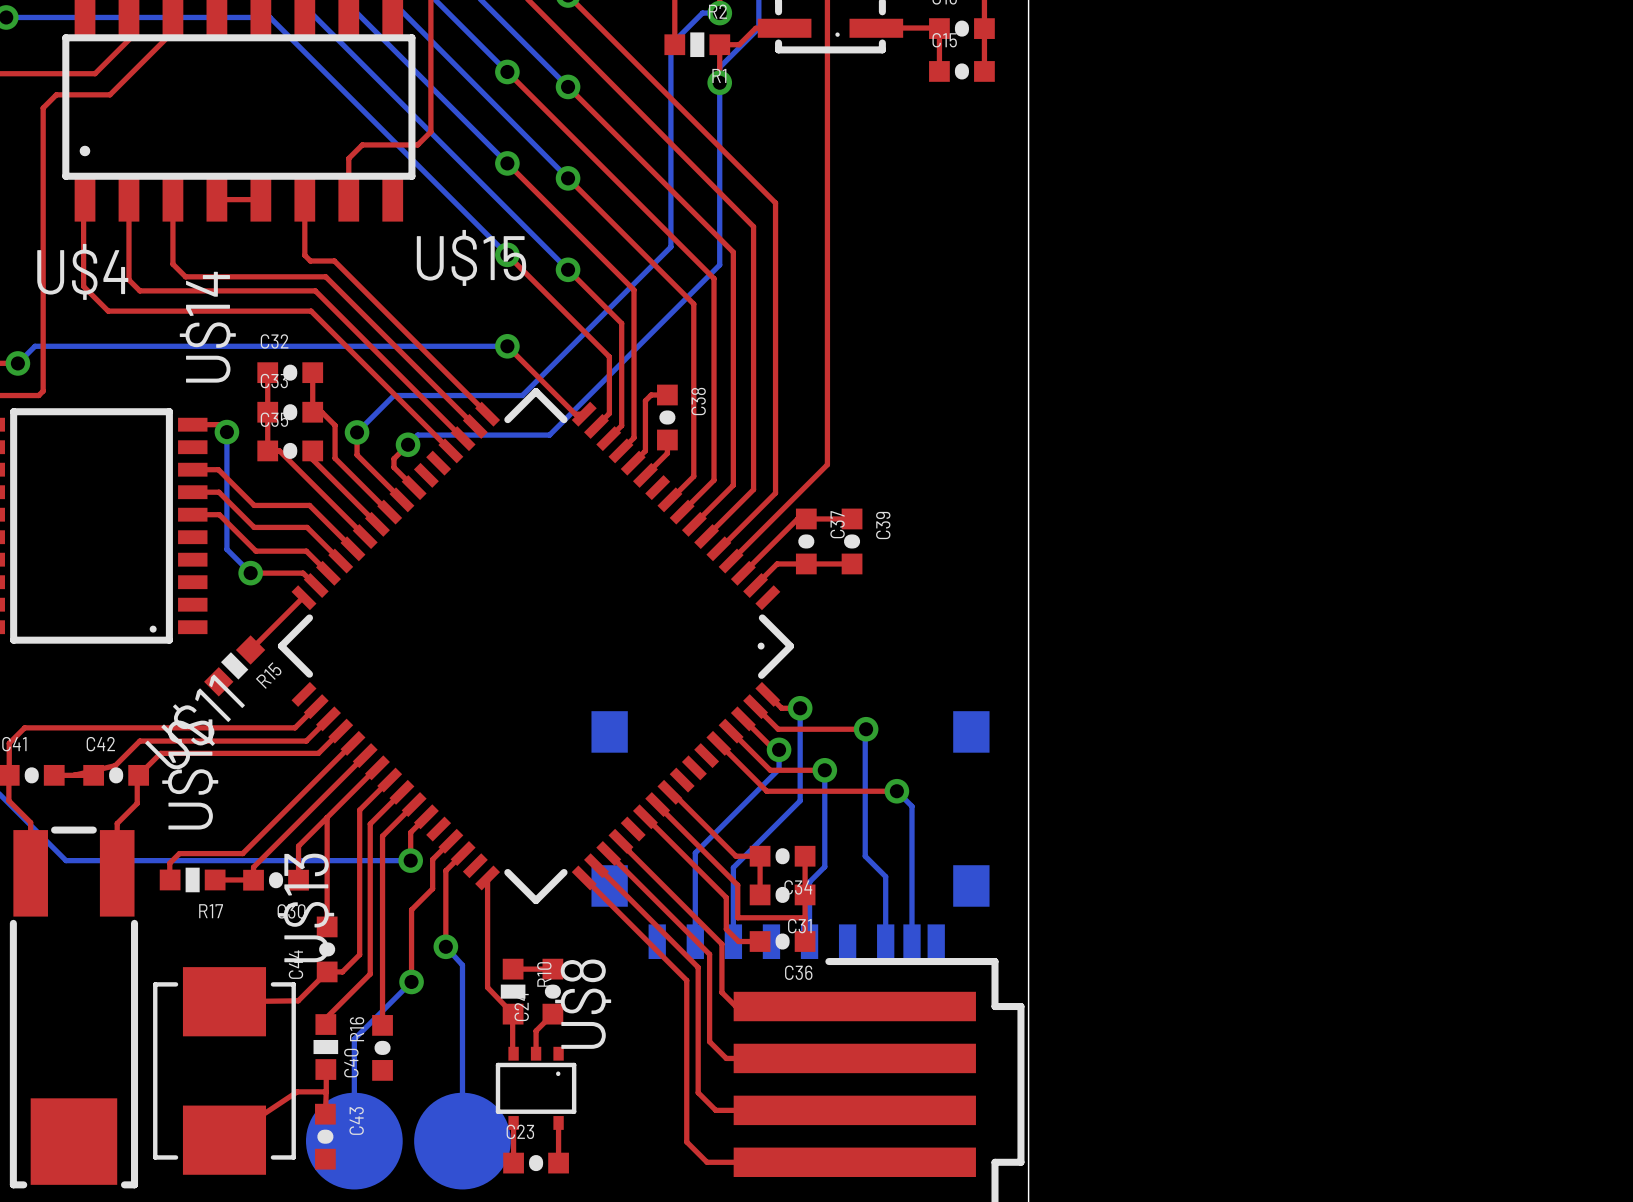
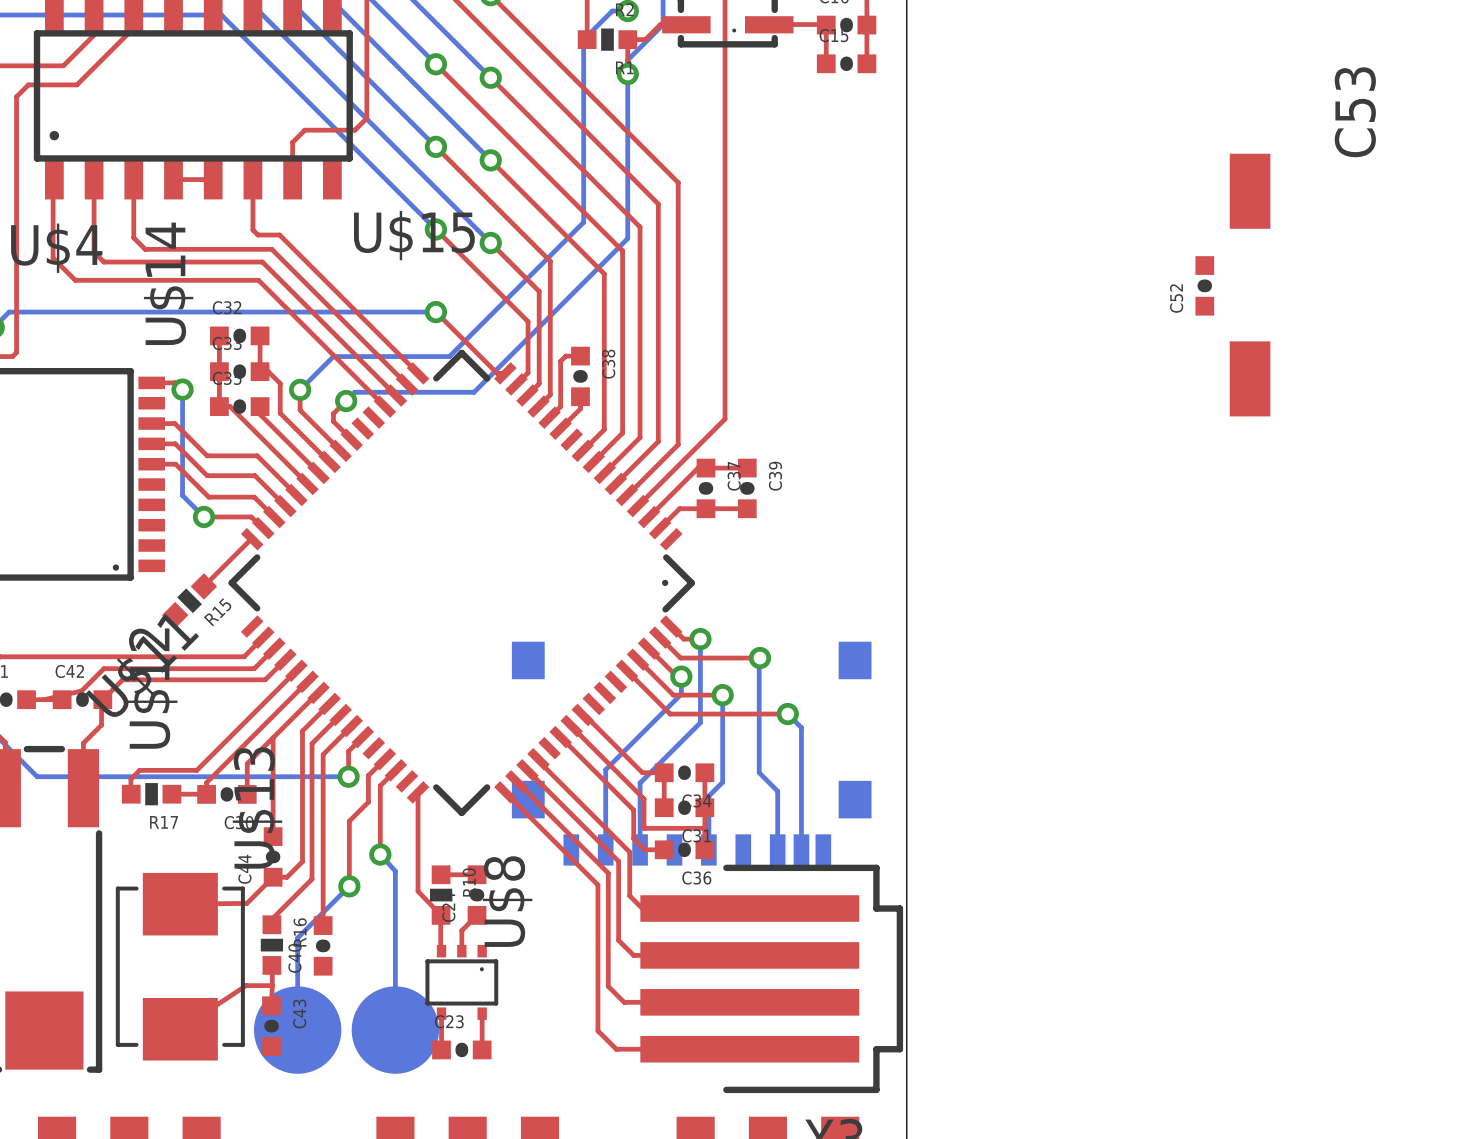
C53: none -> (1250, 285)
C52: none -> (1204, 285)

